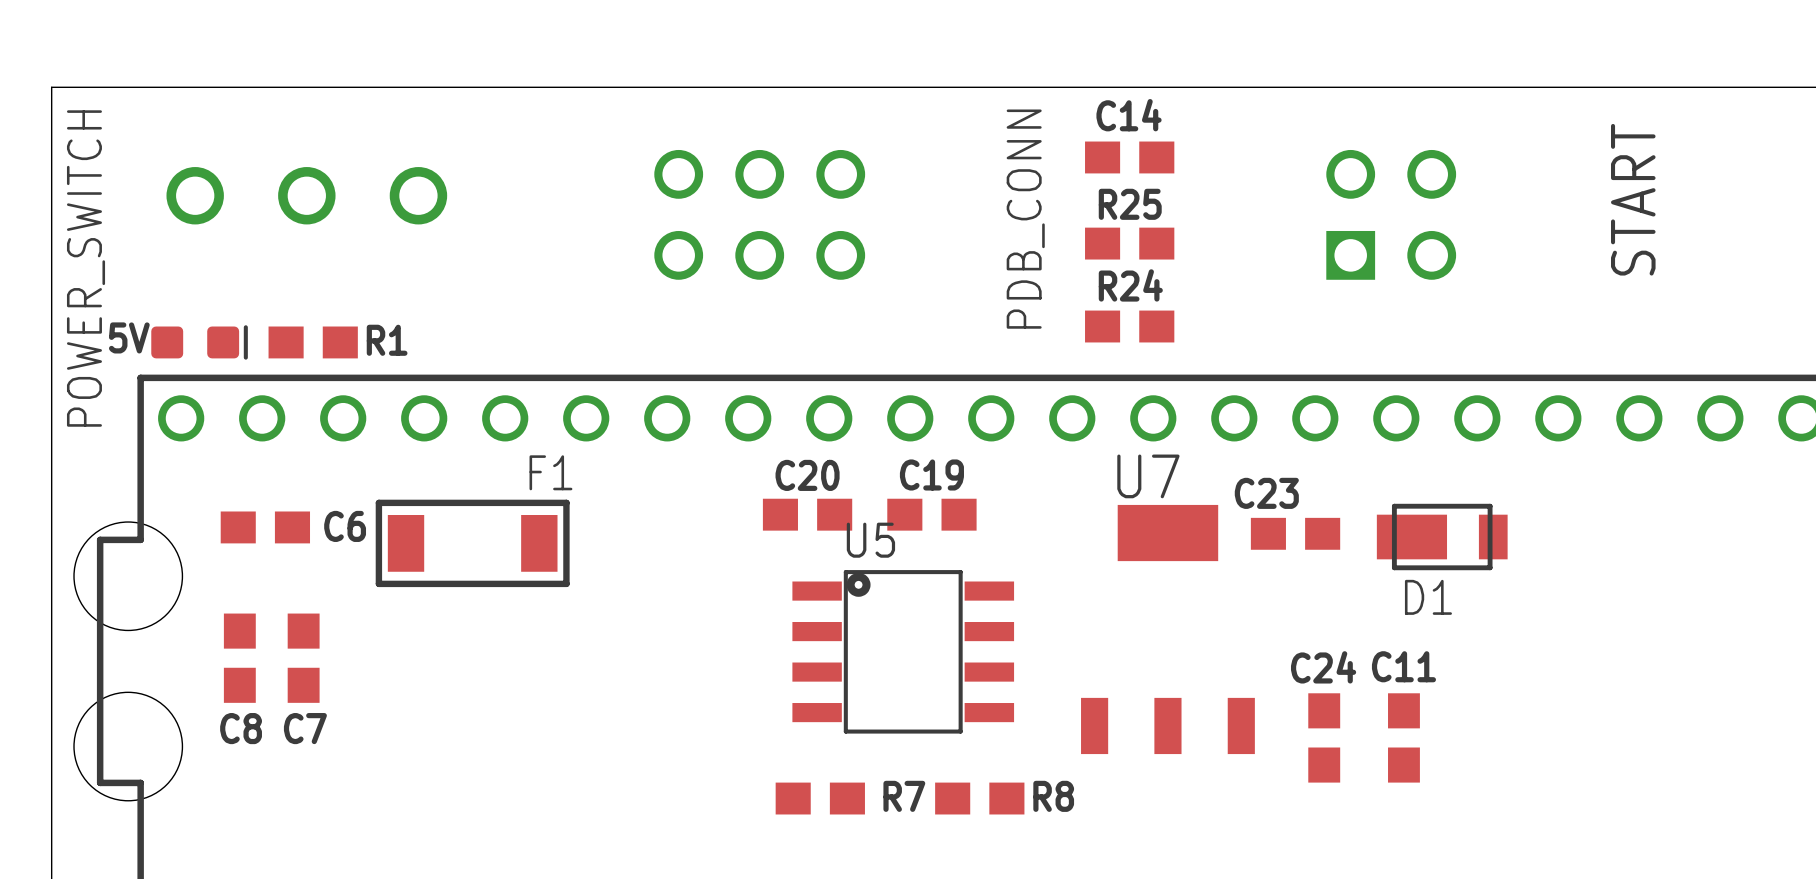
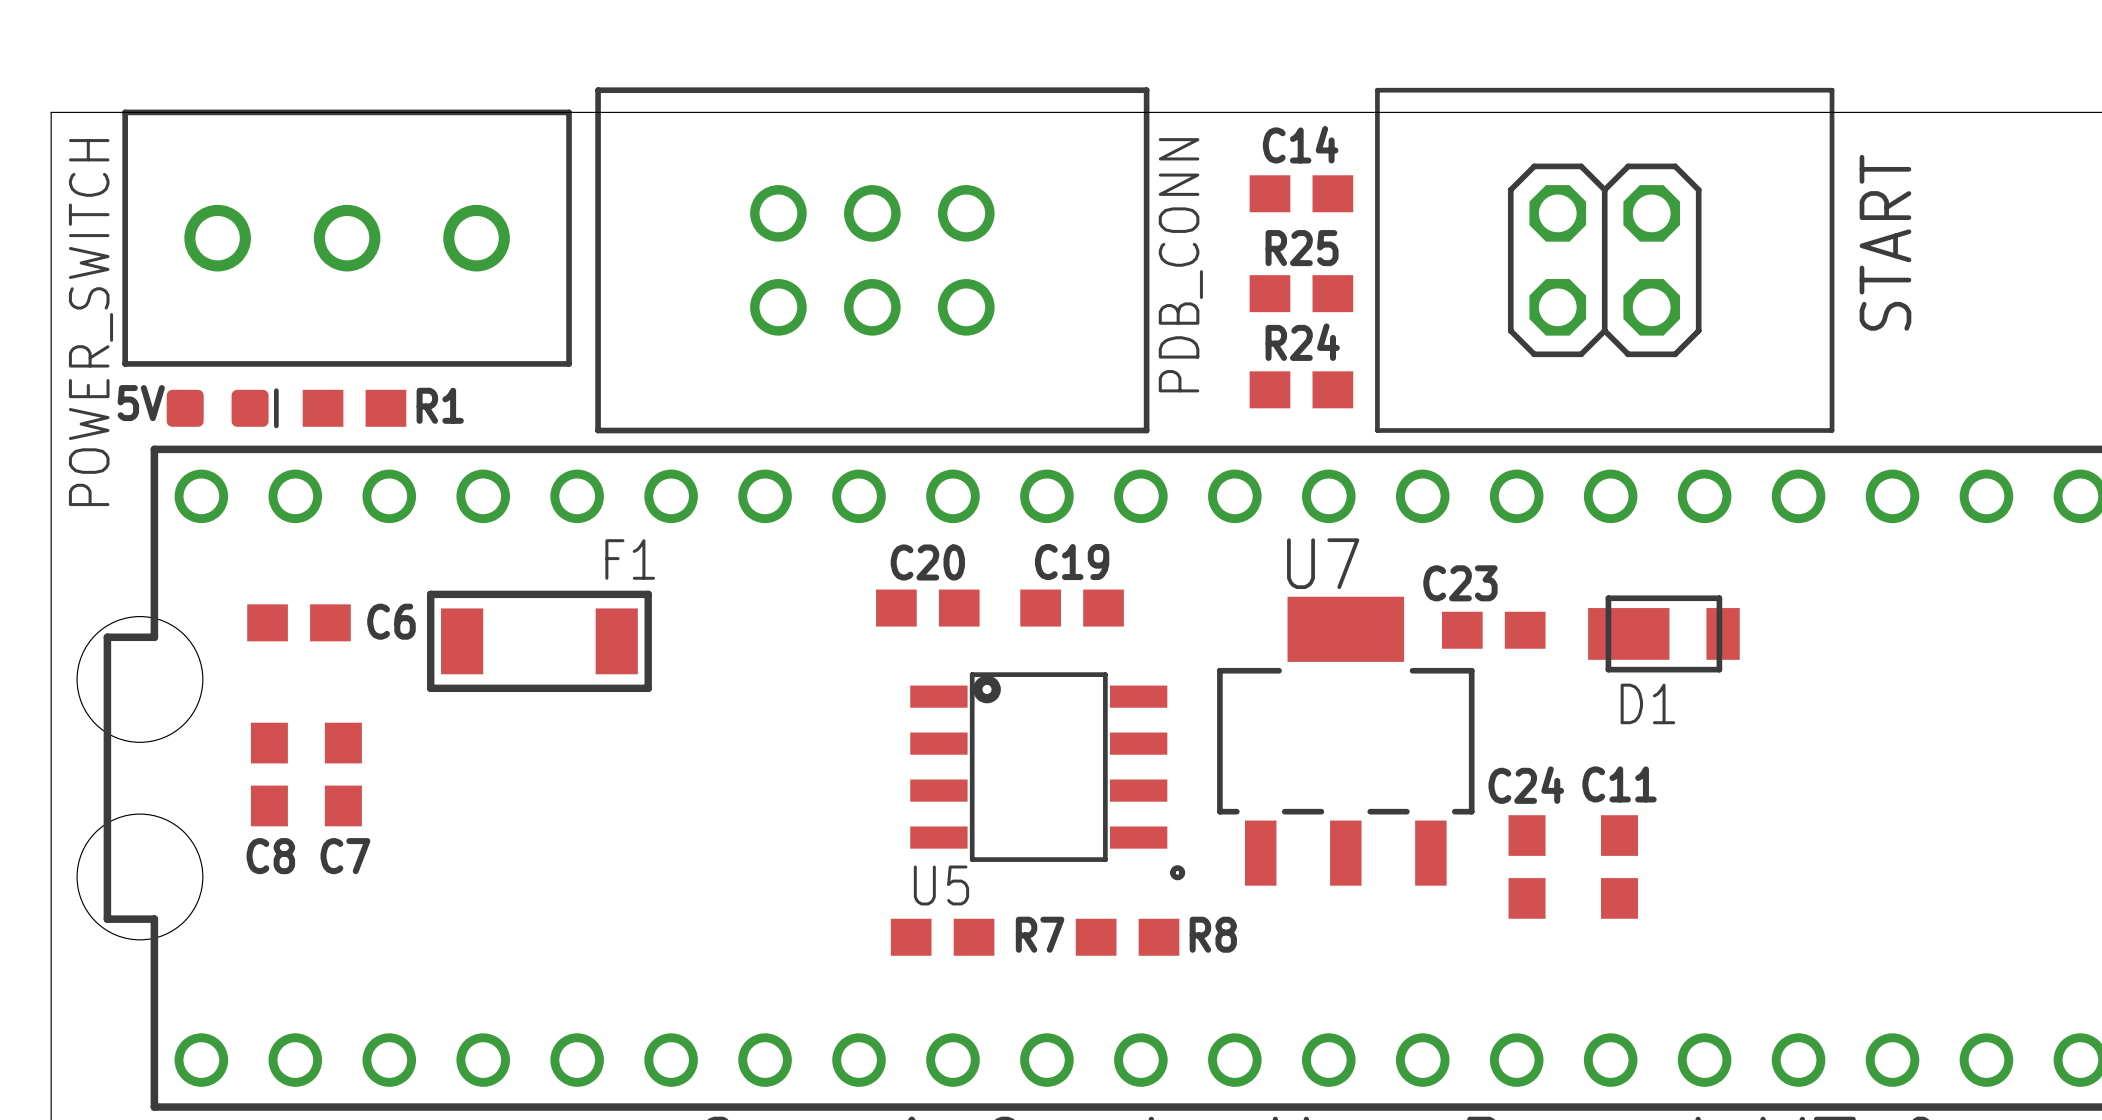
PDB_CONN footprint: [654, 149, 866, 280] -> [595, 87, 1150, 434]
START footprint: [1326, 149, 1457, 280] -> [1375, 87, 1835, 433]
POWER_SWITCH footprint: [166, 167, 448, 225] -> [122, 109, 572, 367]
U7 footprint: [1081, 504, 1255, 755] -> [1170, 596, 1475, 886]
U5 name position: U5 (870, 540) -> U5 (941, 885)

